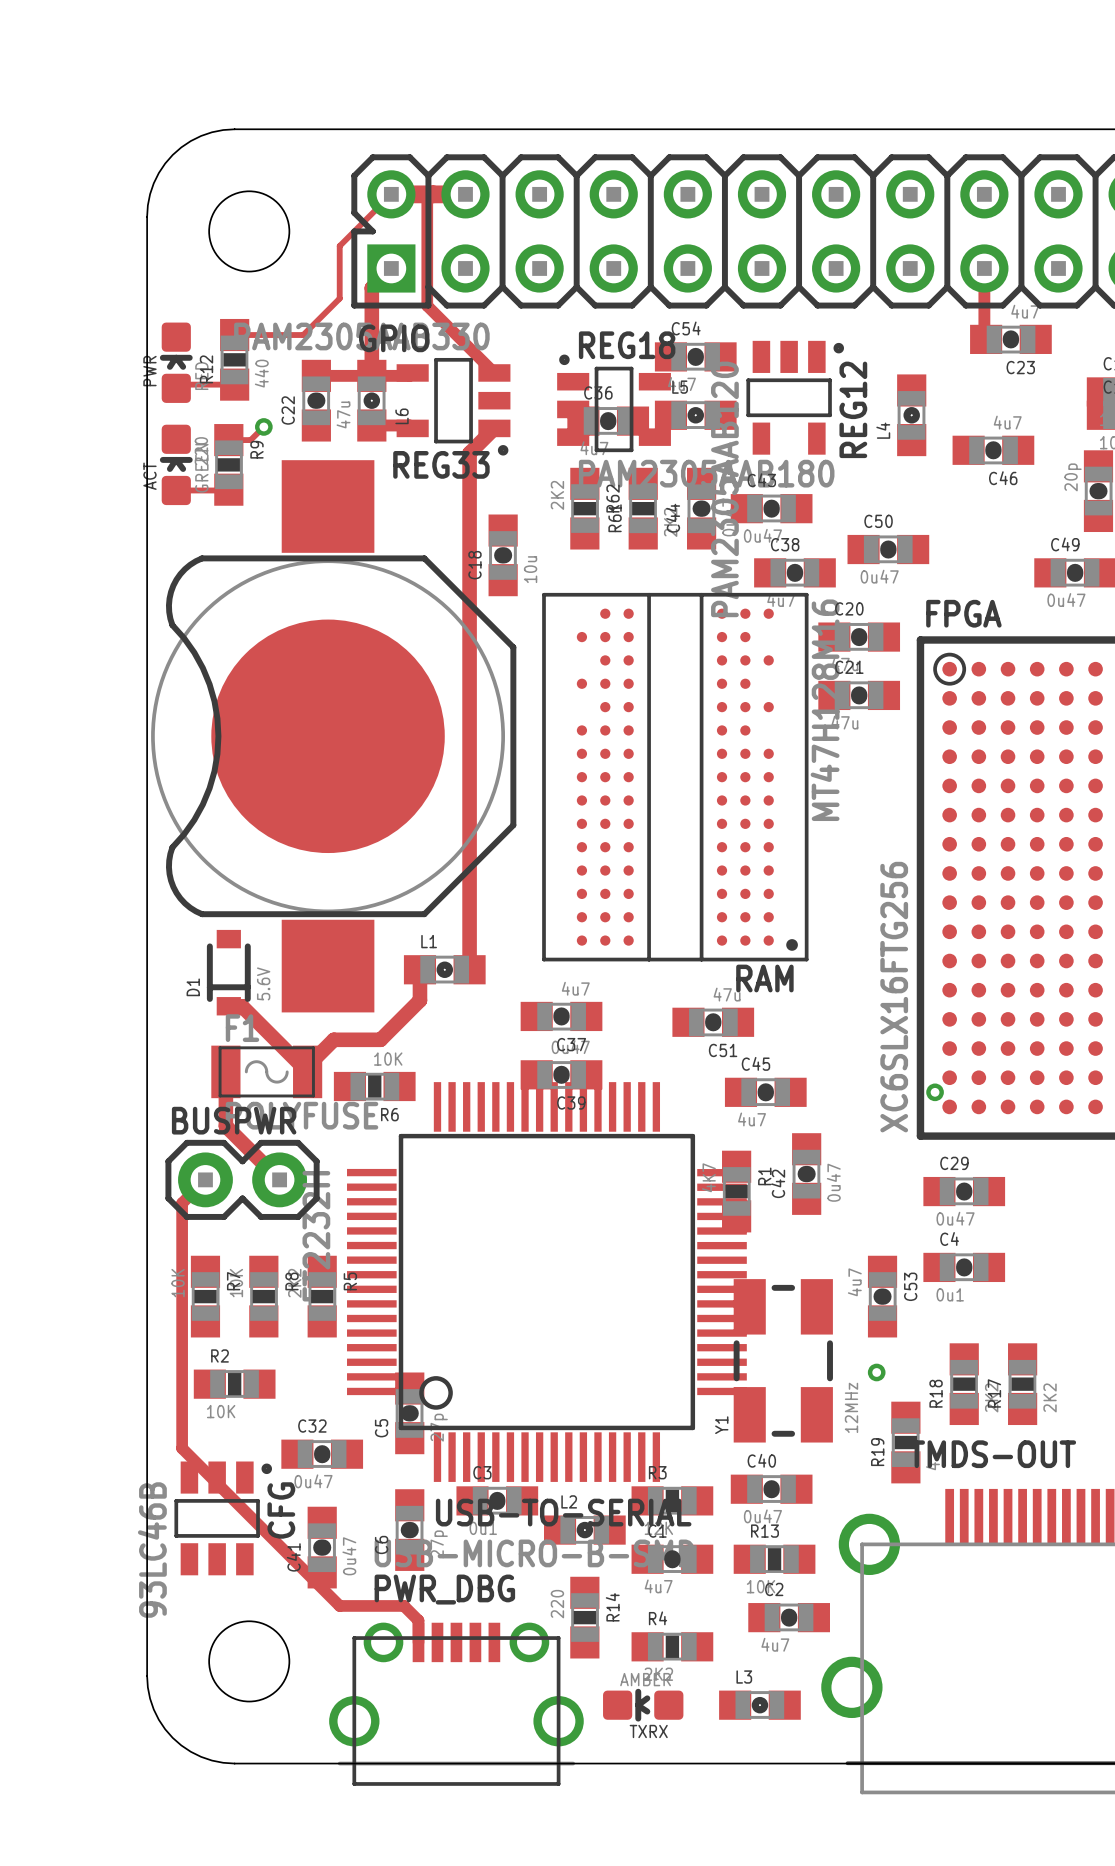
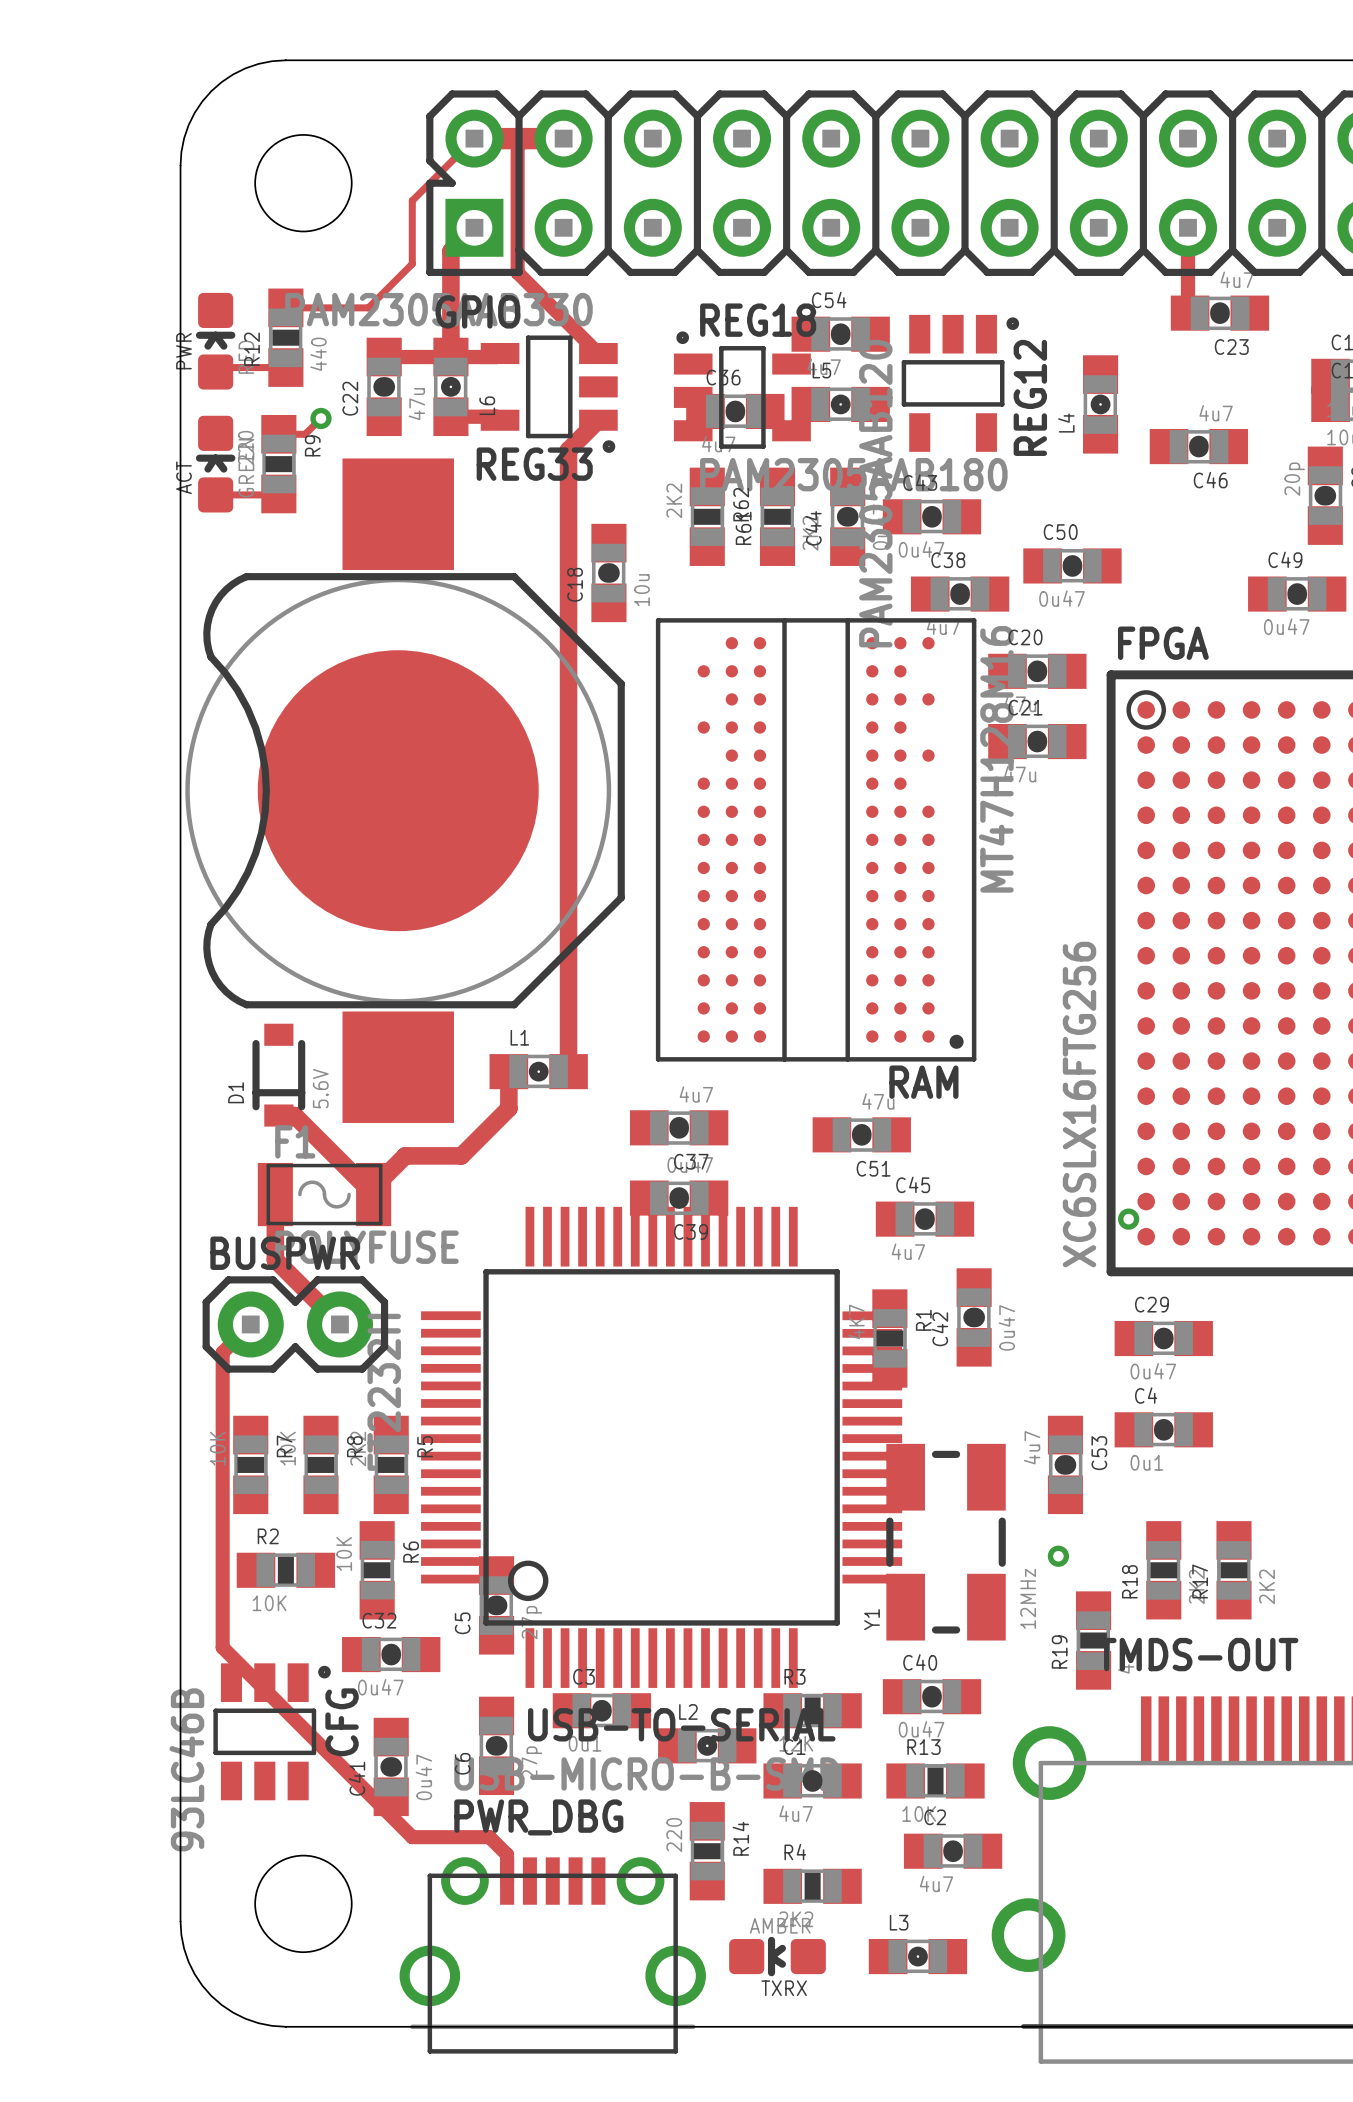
R6 rotation: 0° (374, 1086) -> 90° clockwise (377, 1570)
R6 position: (374, 1086) -> (377, 1570)

